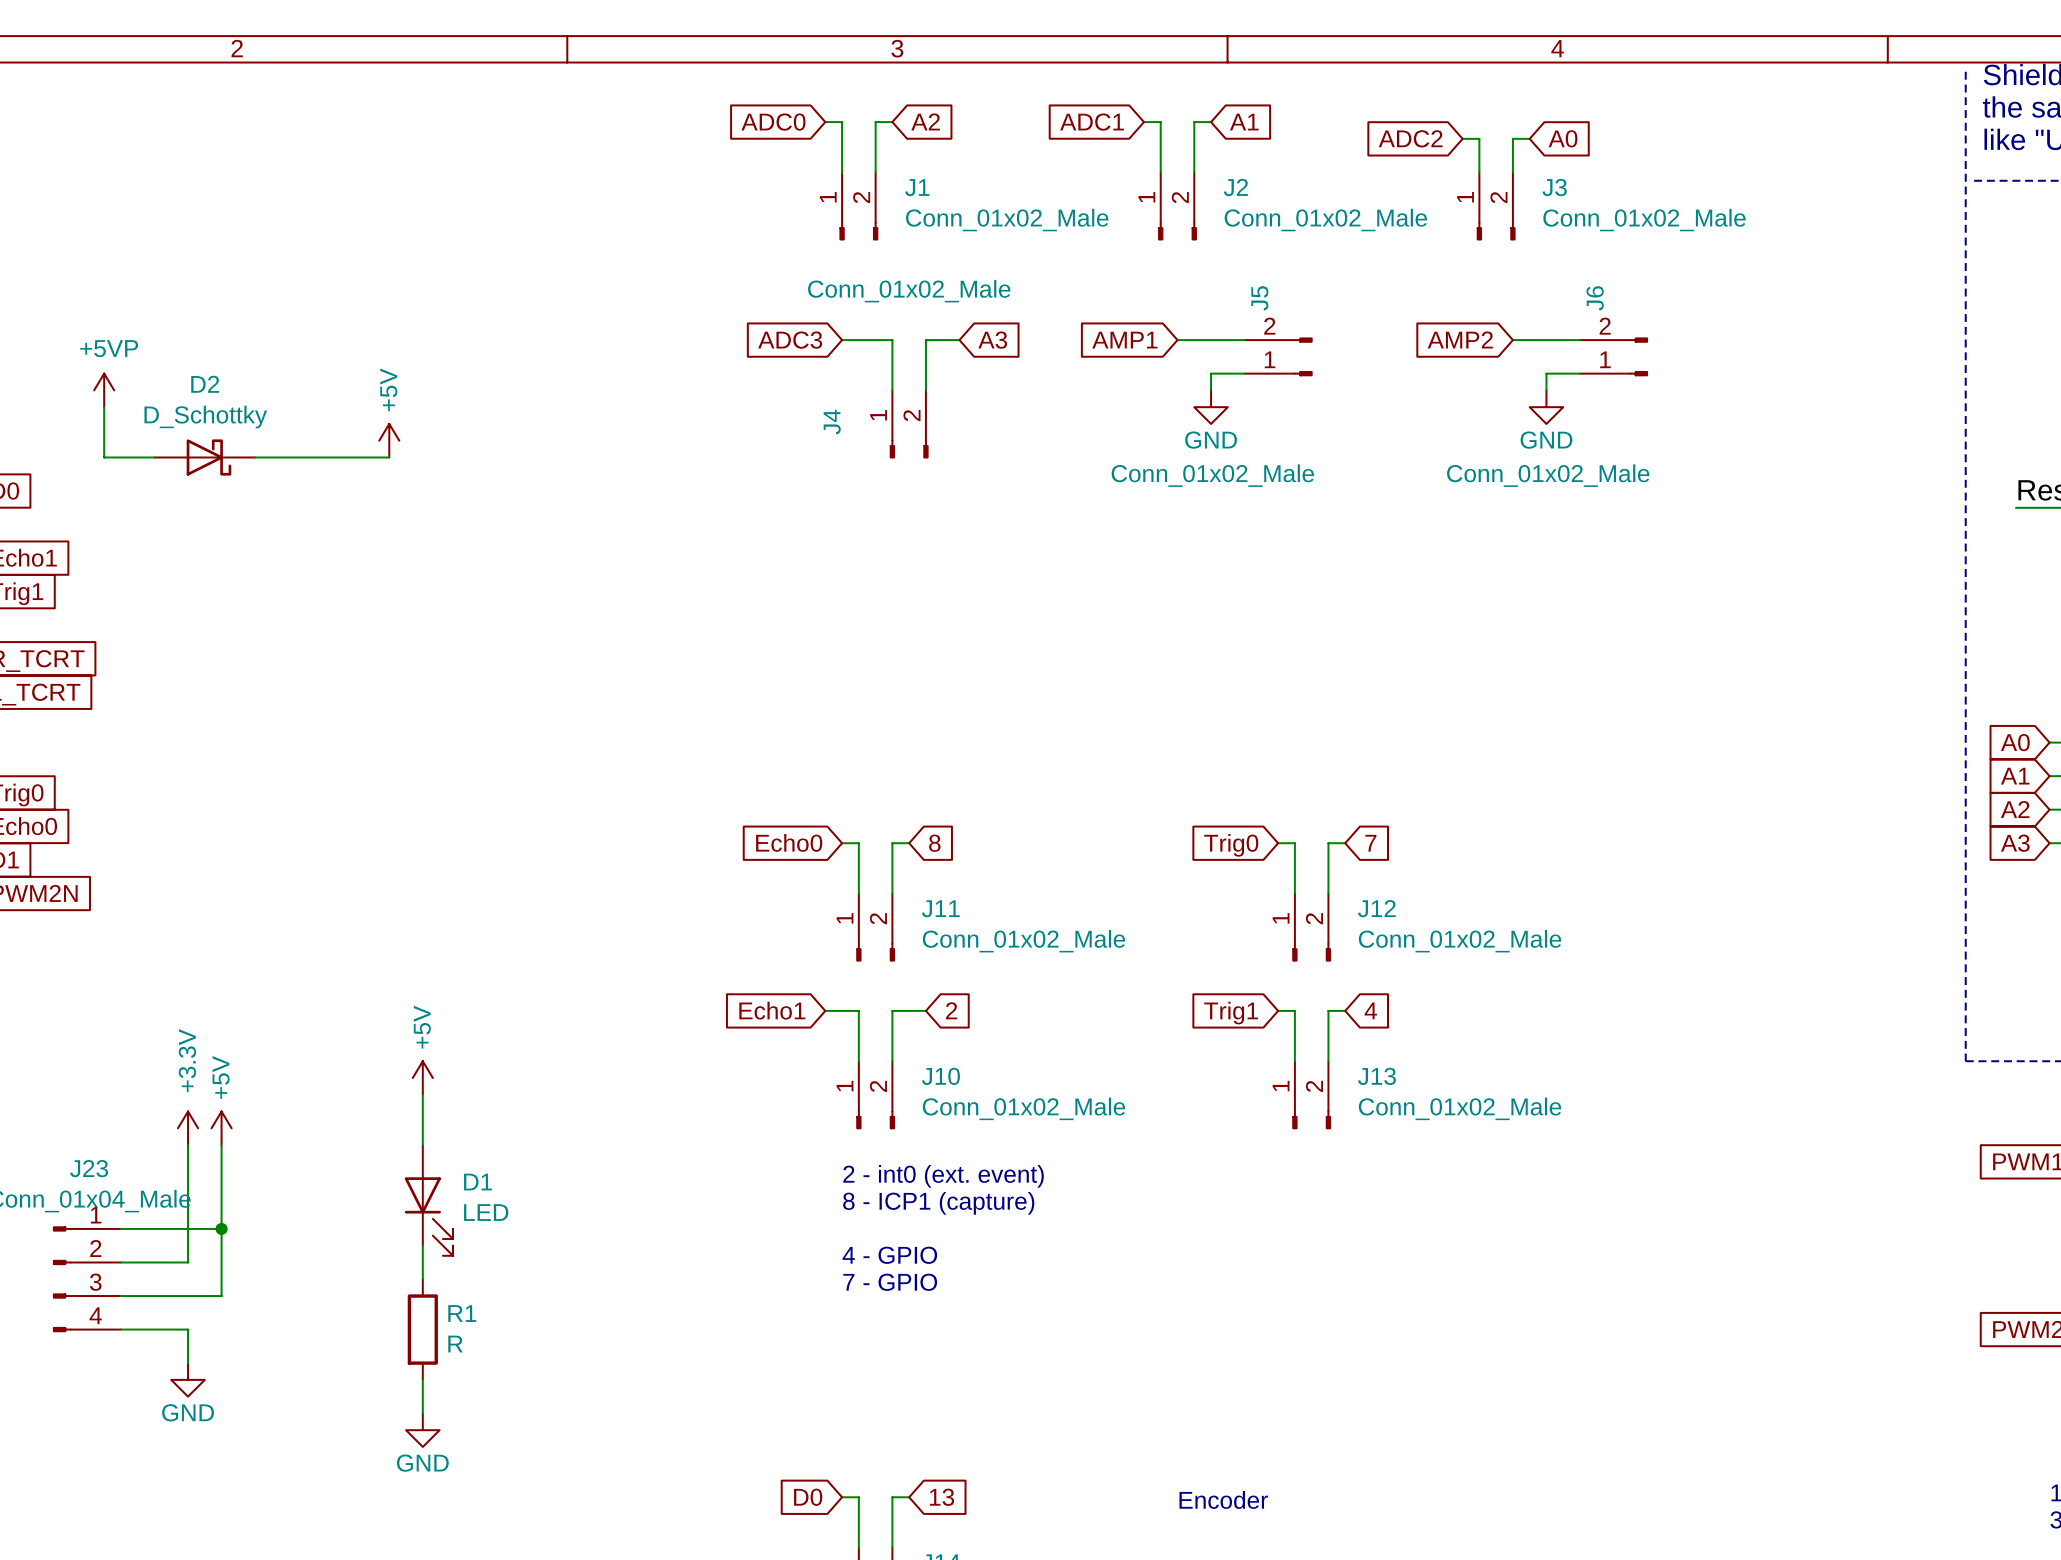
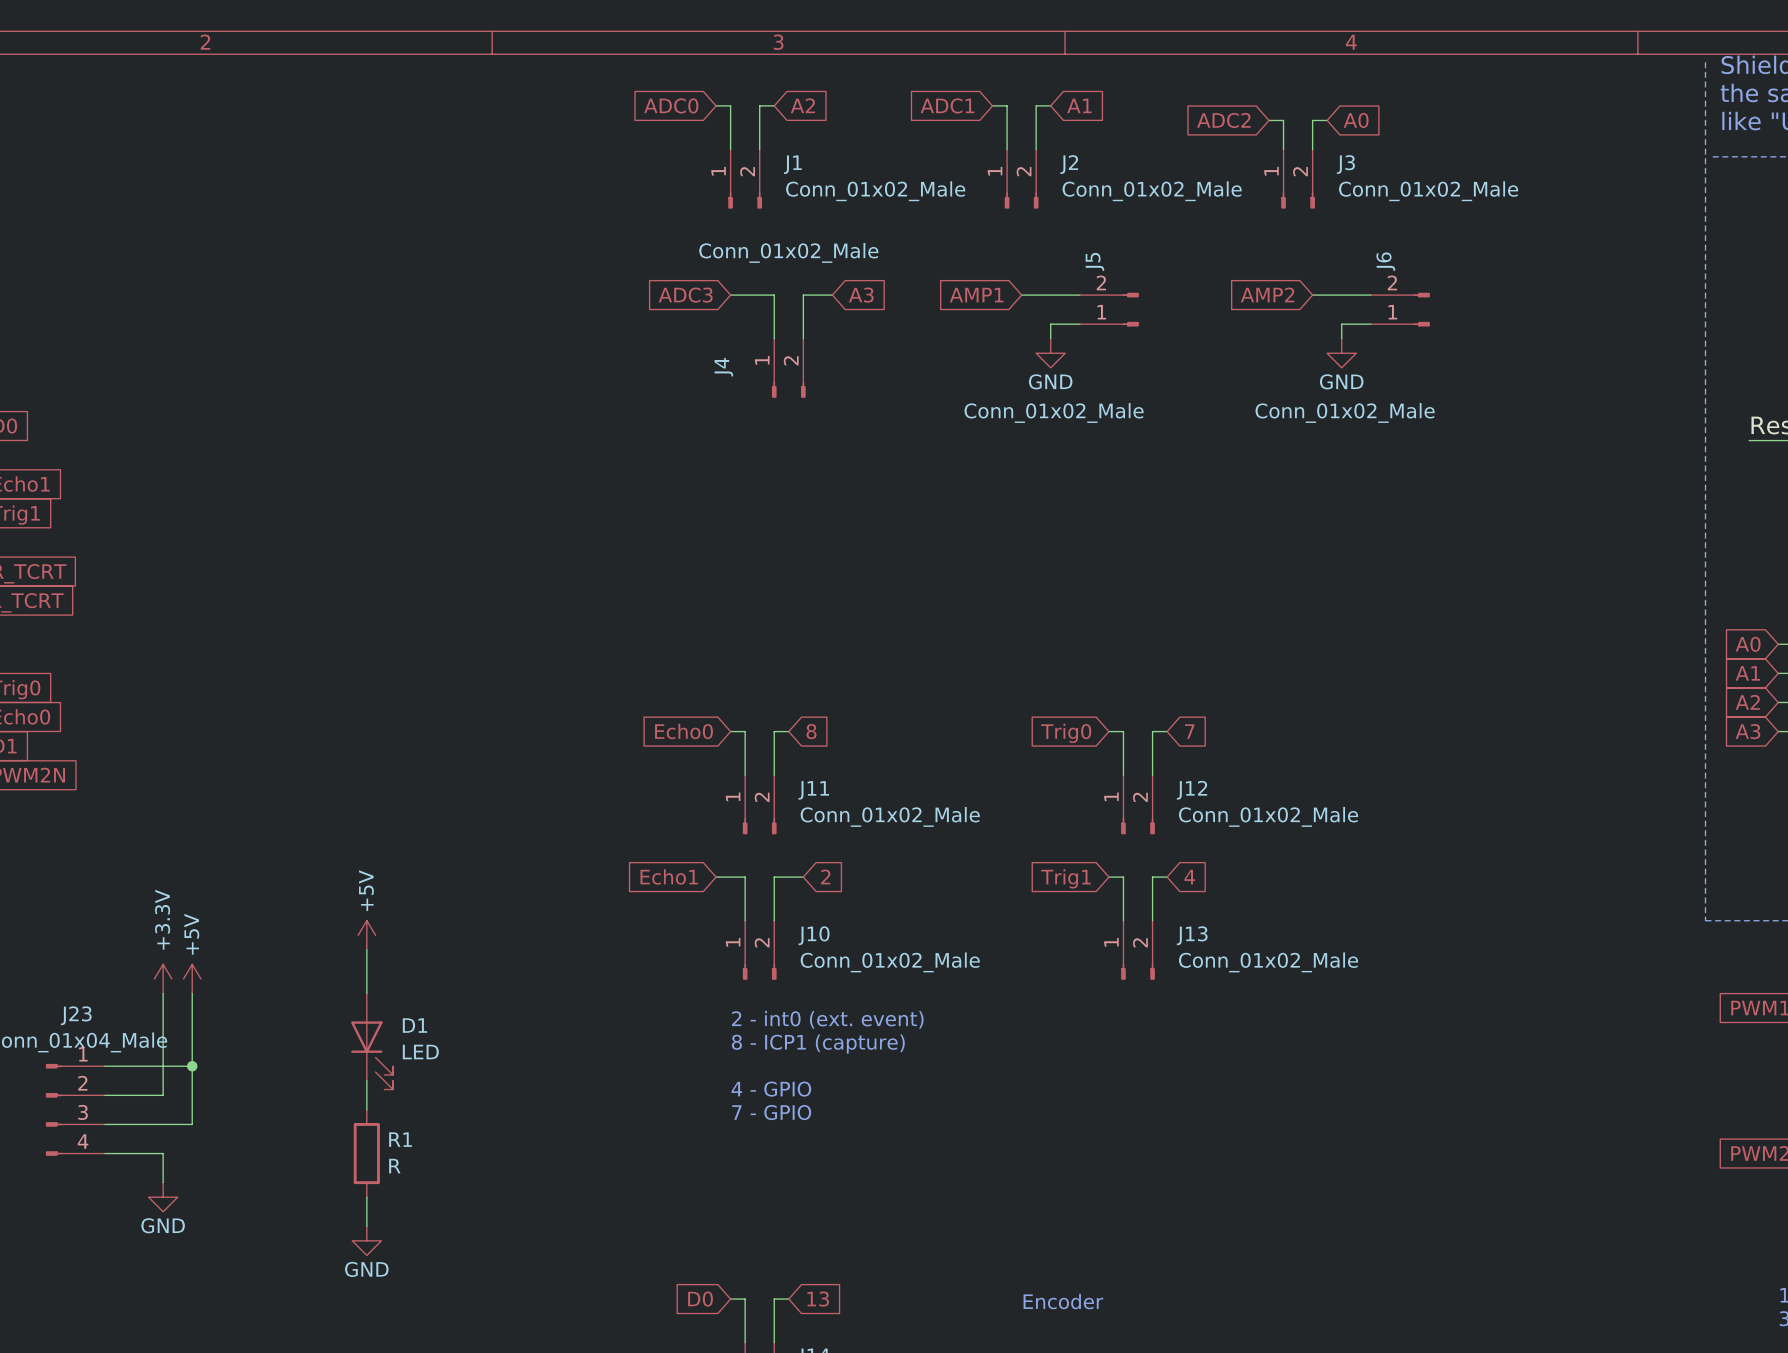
power symbol: +5VP (104, 390) -> none
wire: (104, 407) (104, 457) (154, 457) -> none
power symbol: +5V (389, 440) -> none
D2: D_Schottky (204, 457) -> none
wire: (255, 457) (389, 457) -> none

